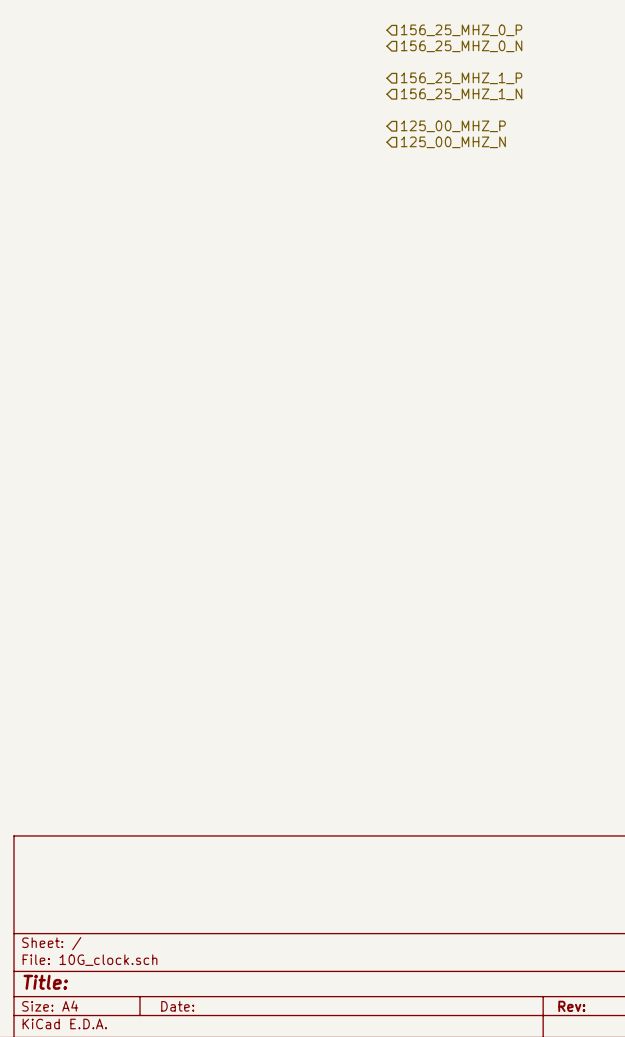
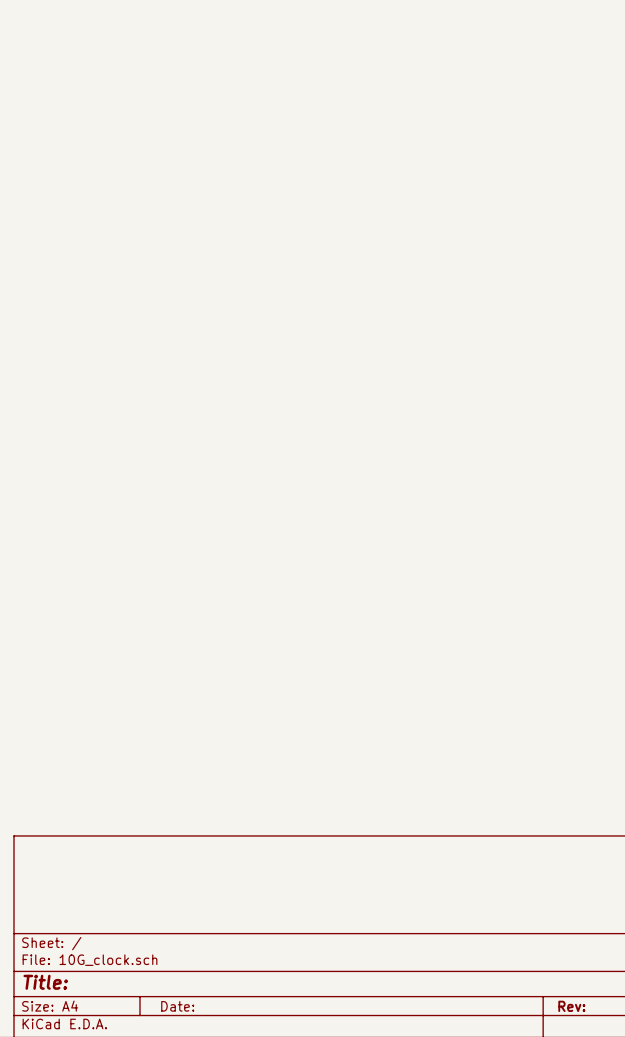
hierarchical label: 156_25_MHZ_0_P (461, 30) -> none
hierarchical label: 156_25_MHZ_0_N (461, 46) -> none
hierarchical label: 156_25_MHZ_1_P (461, 78) -> none
hierarchical label: 156_25_MHZ_1_N (461, 94) -> none
hierarchical label: 125_00_MHZ_P (453, 126) -> none
hierarchical label: 125_00_MHZ_N (453, 142) -> none

